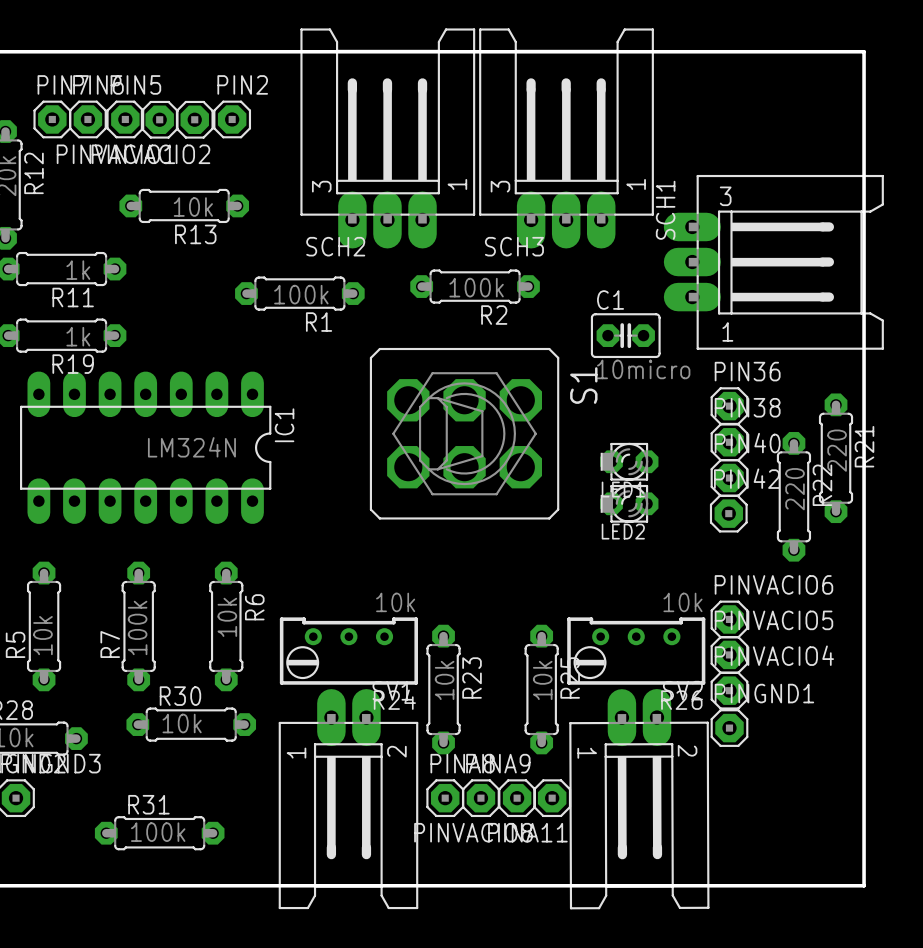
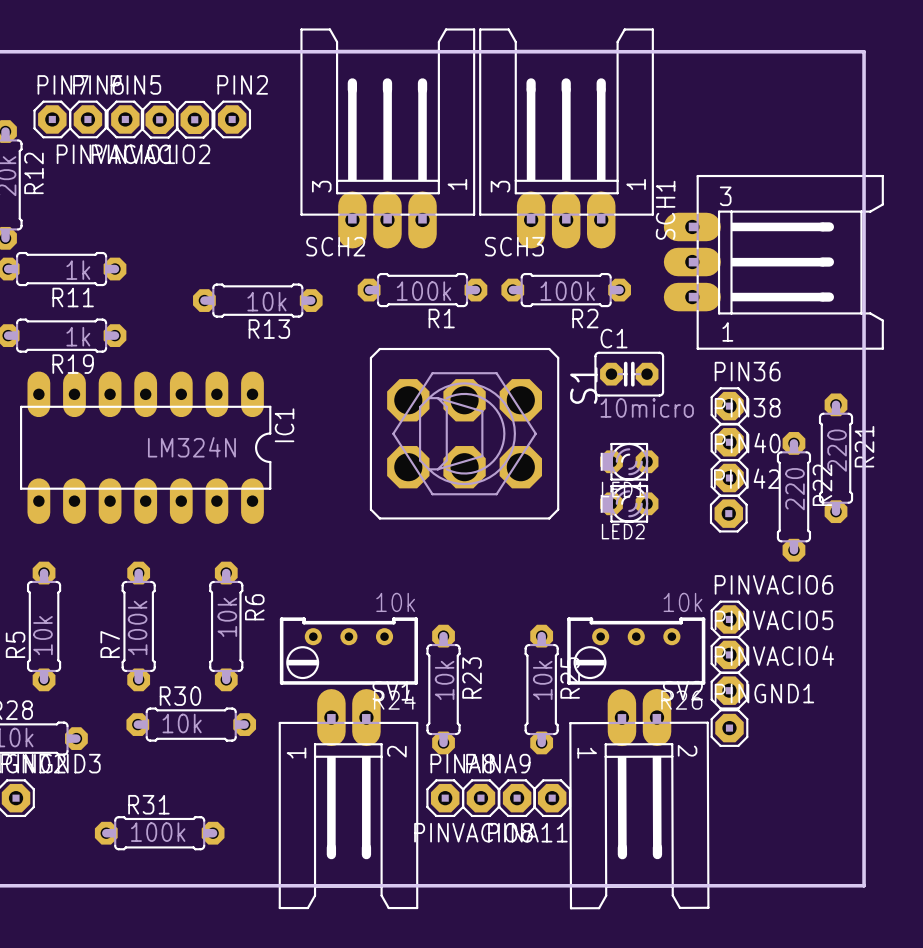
R13 position: (184, 205) -> (257, 300)
R2 position: (475, 286) -> (566, 290)
R1 position: (299, 293) -> (422, 290)
C1 position: (625, 335) -> (629, 374)

